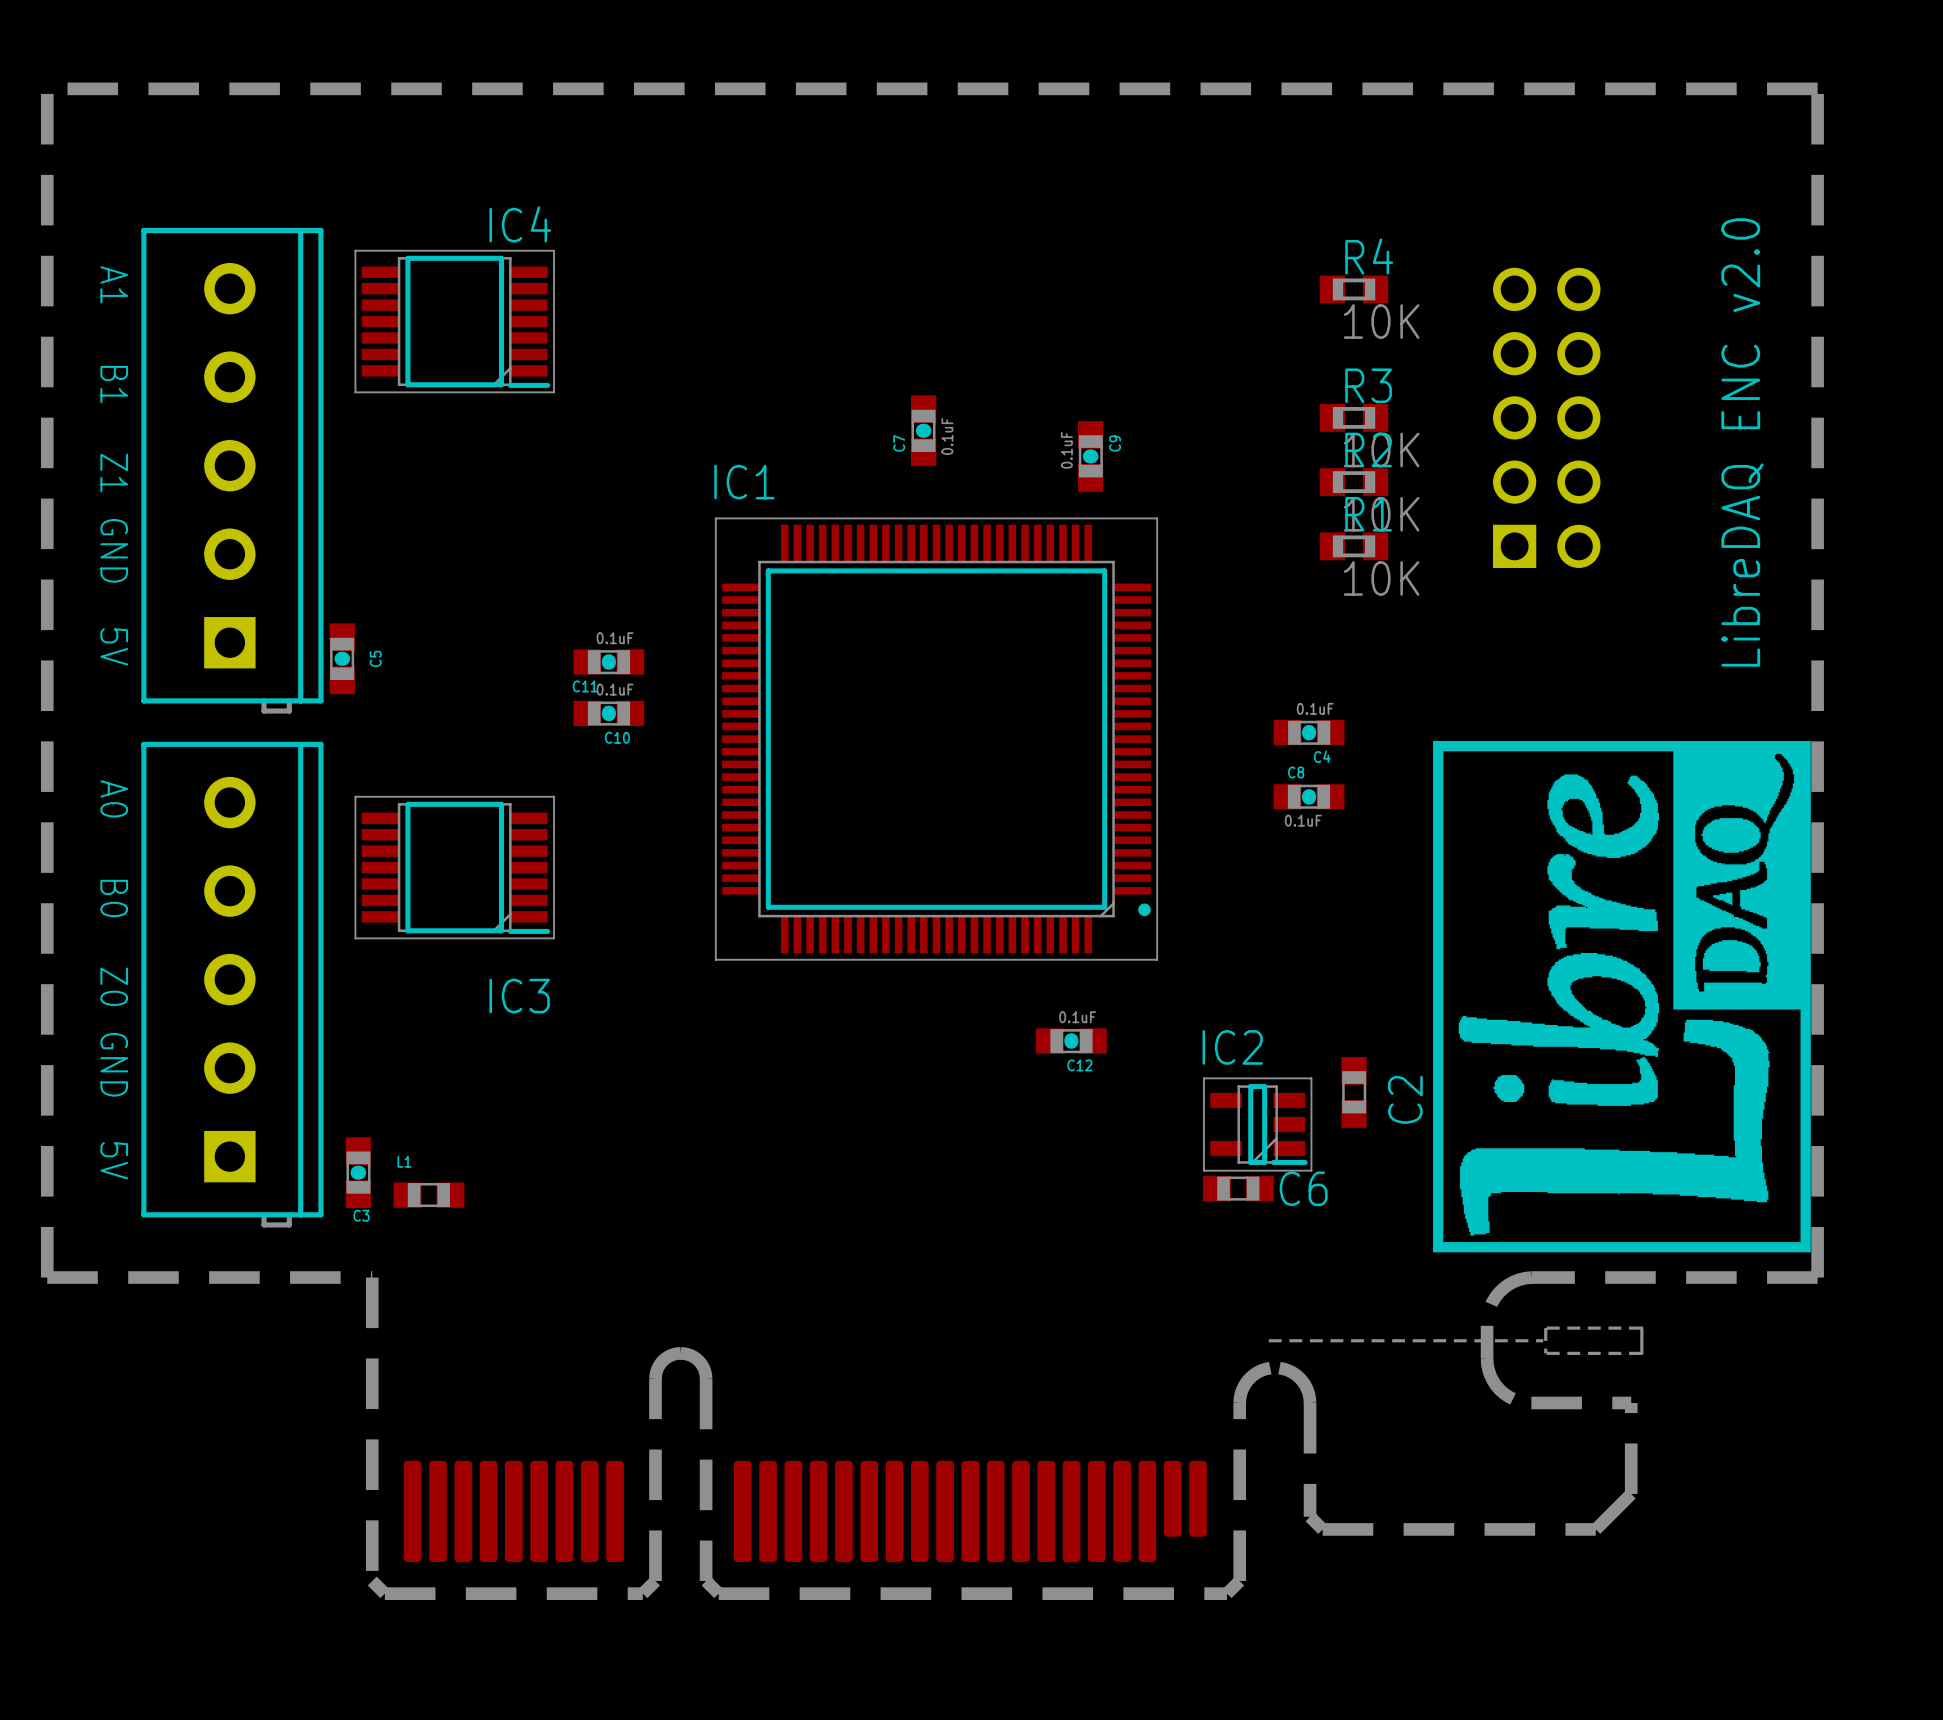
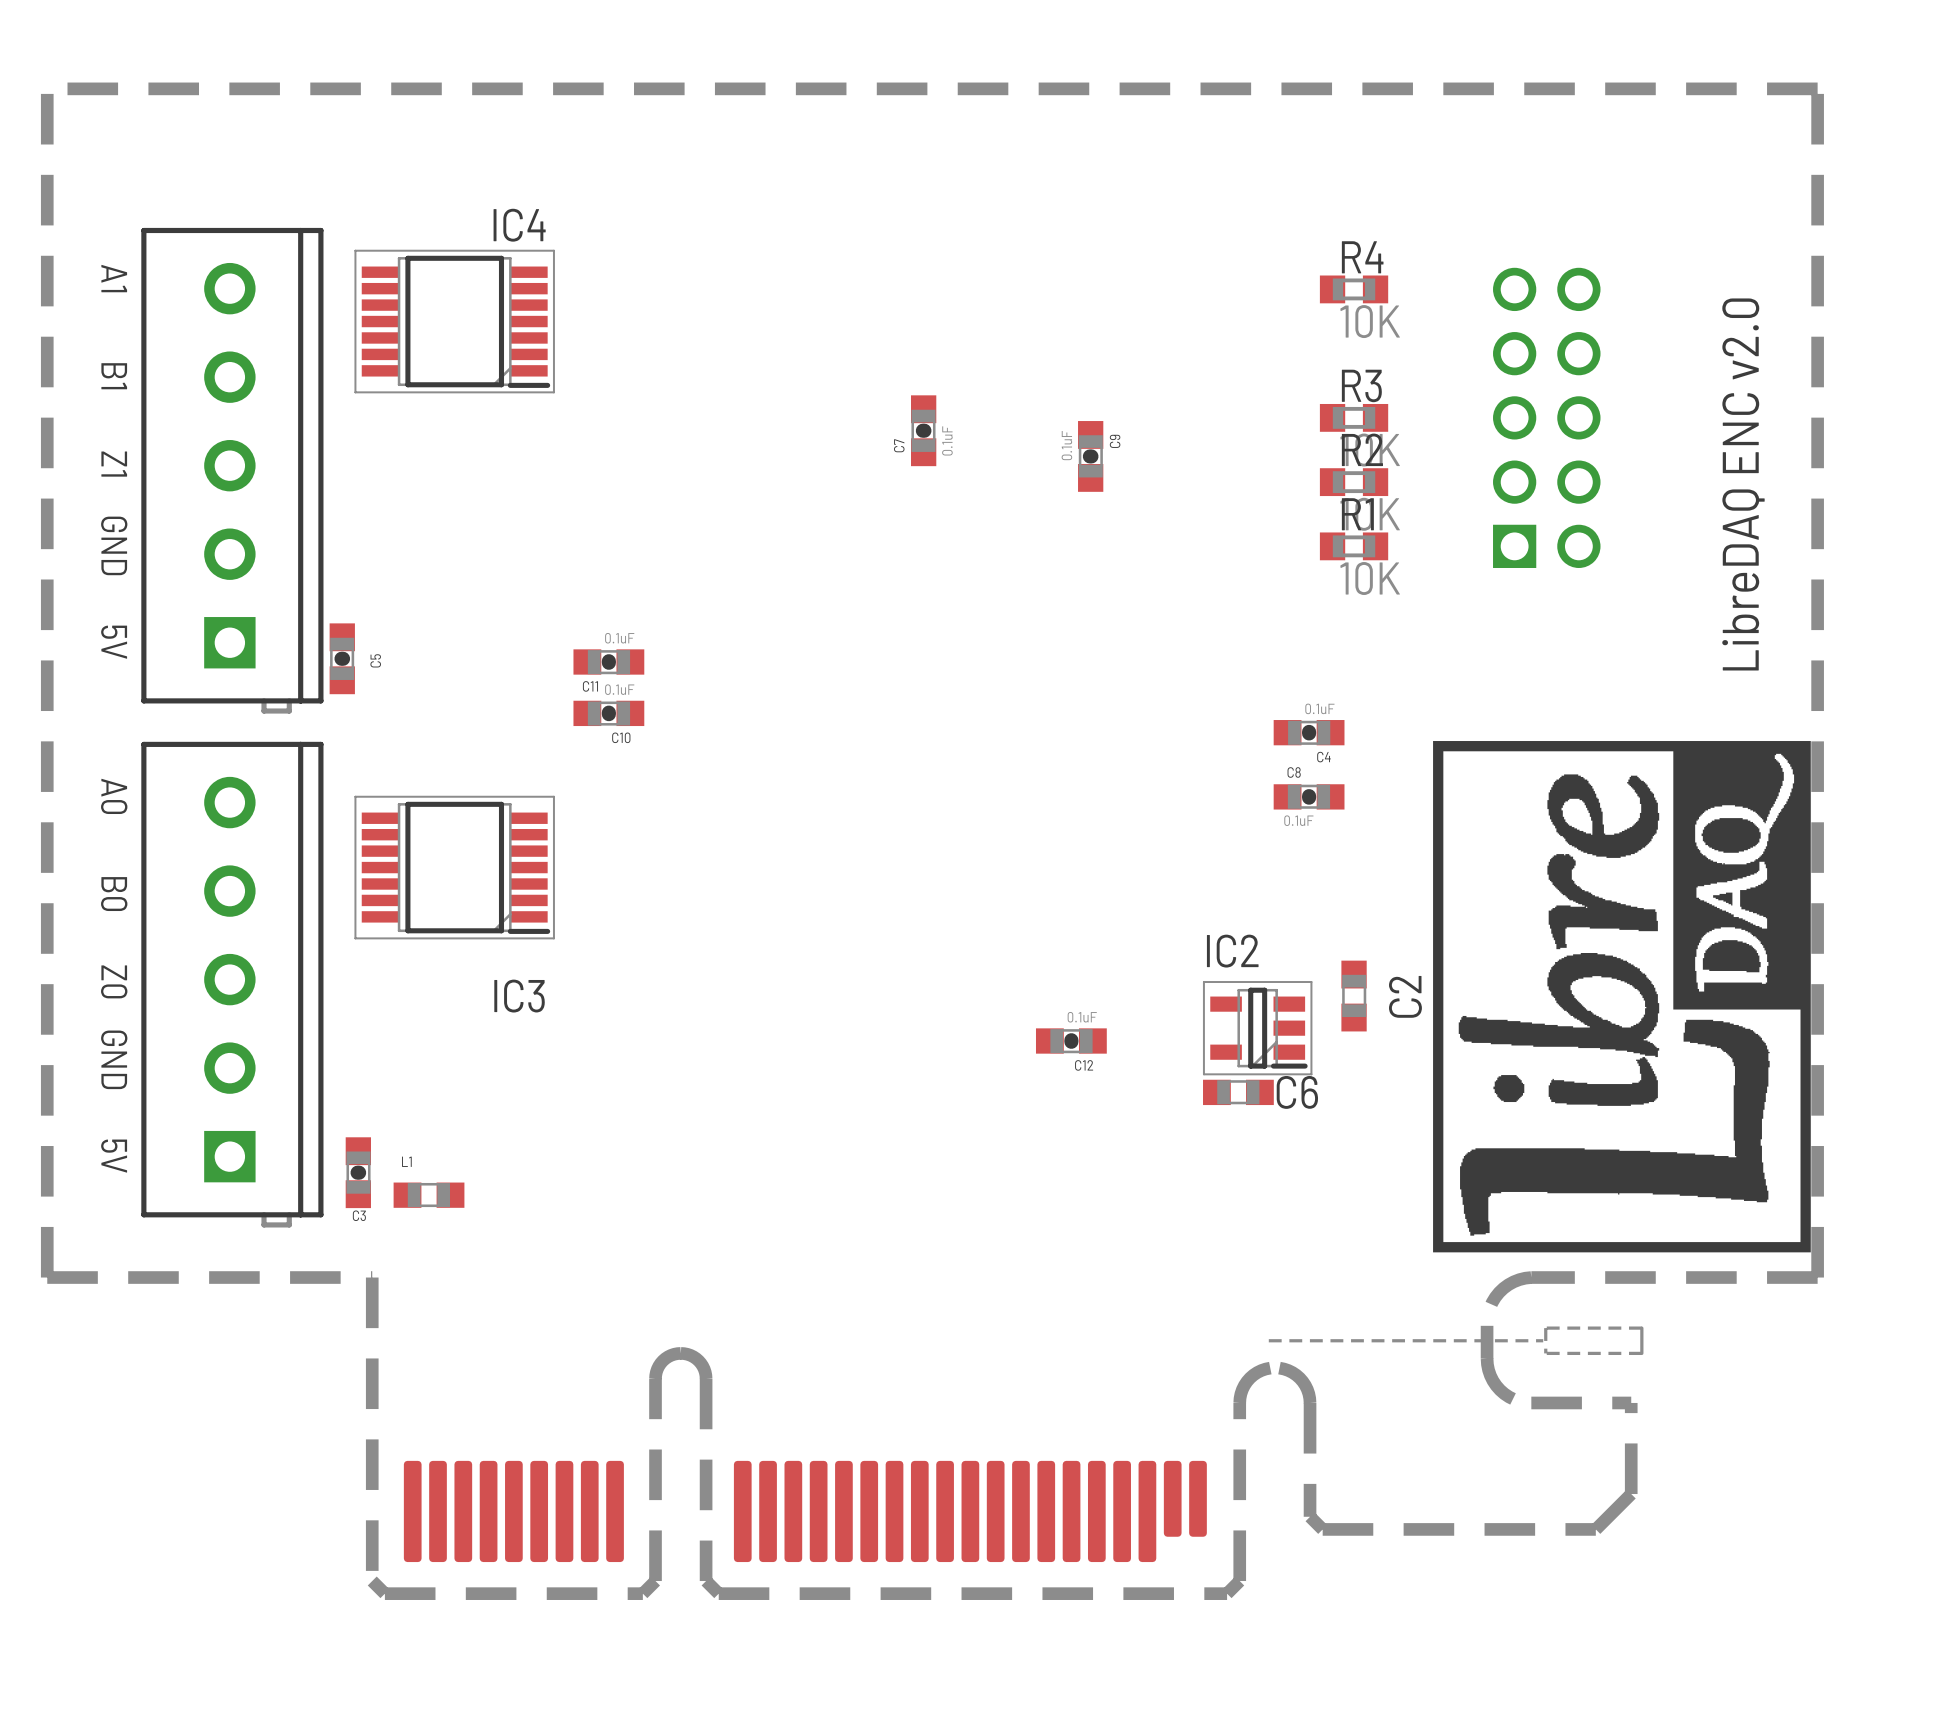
IC1: (936, 739) -> none
C2 position: (1354, 1092) -> (1354, 996)
IC2 position: (1257, 1124) -> (1257, 1028)
C6 position: (1238, 1188) -> (1238, 1092)

